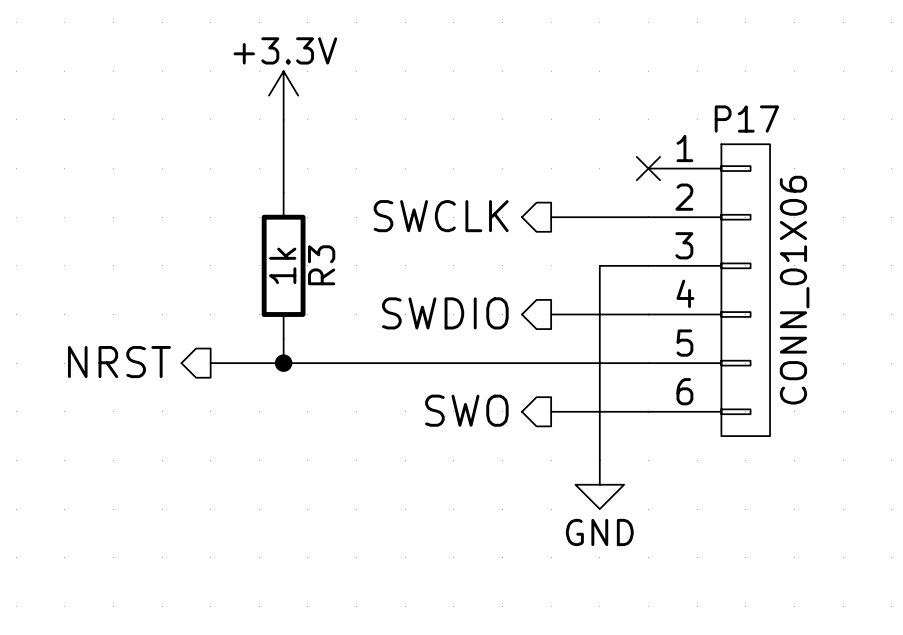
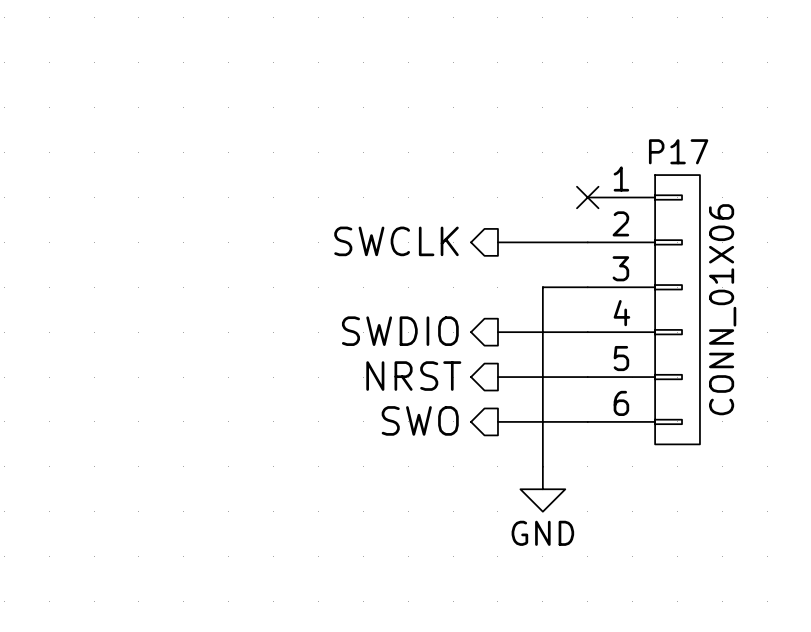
power symbol: +3.3V (283, 95) -> none
wire: (283, 119) (283, 192) -> none
R3: 1k (283, 265) -> none
wire: (283, 338) (283, 363) -> none
hierarchical label position: NRST (119, 362) -> NRST (413, 376)
wire: (210, 363) (551, 363) -> none
junction: (283, 363) -> none

